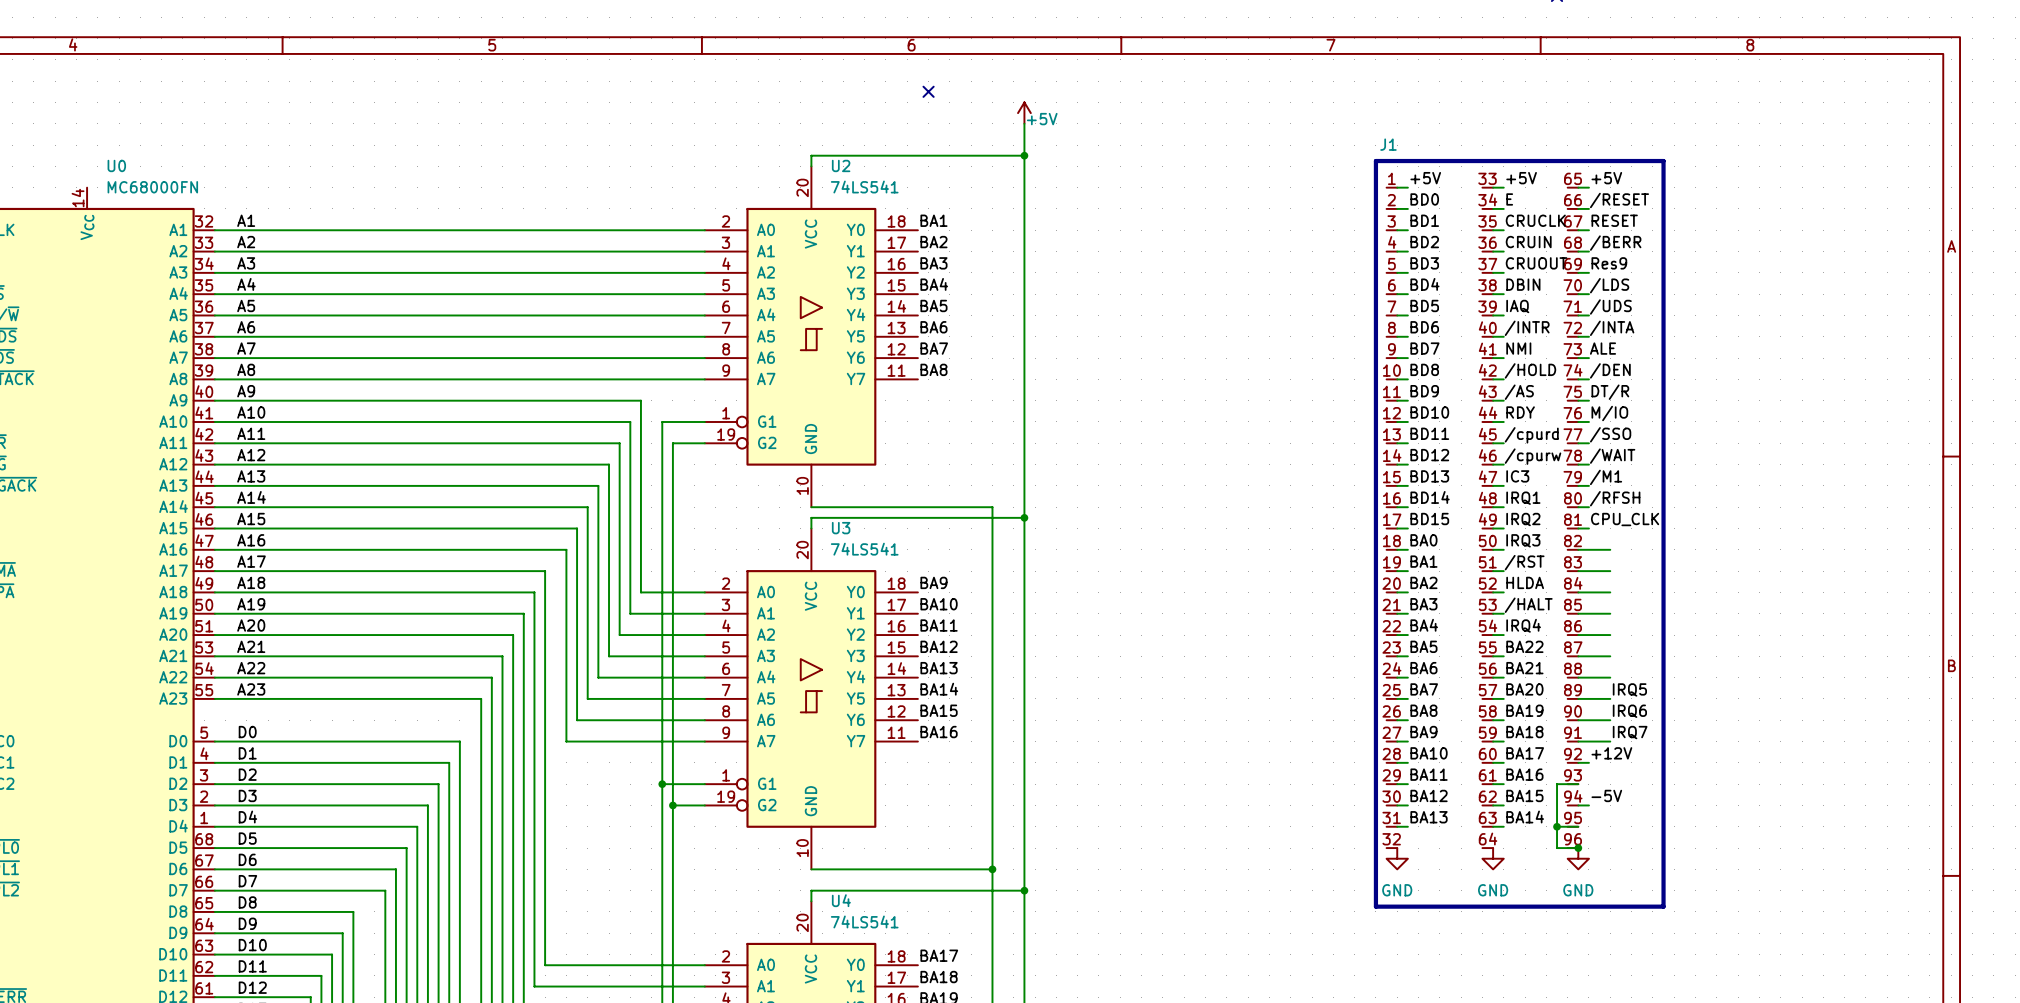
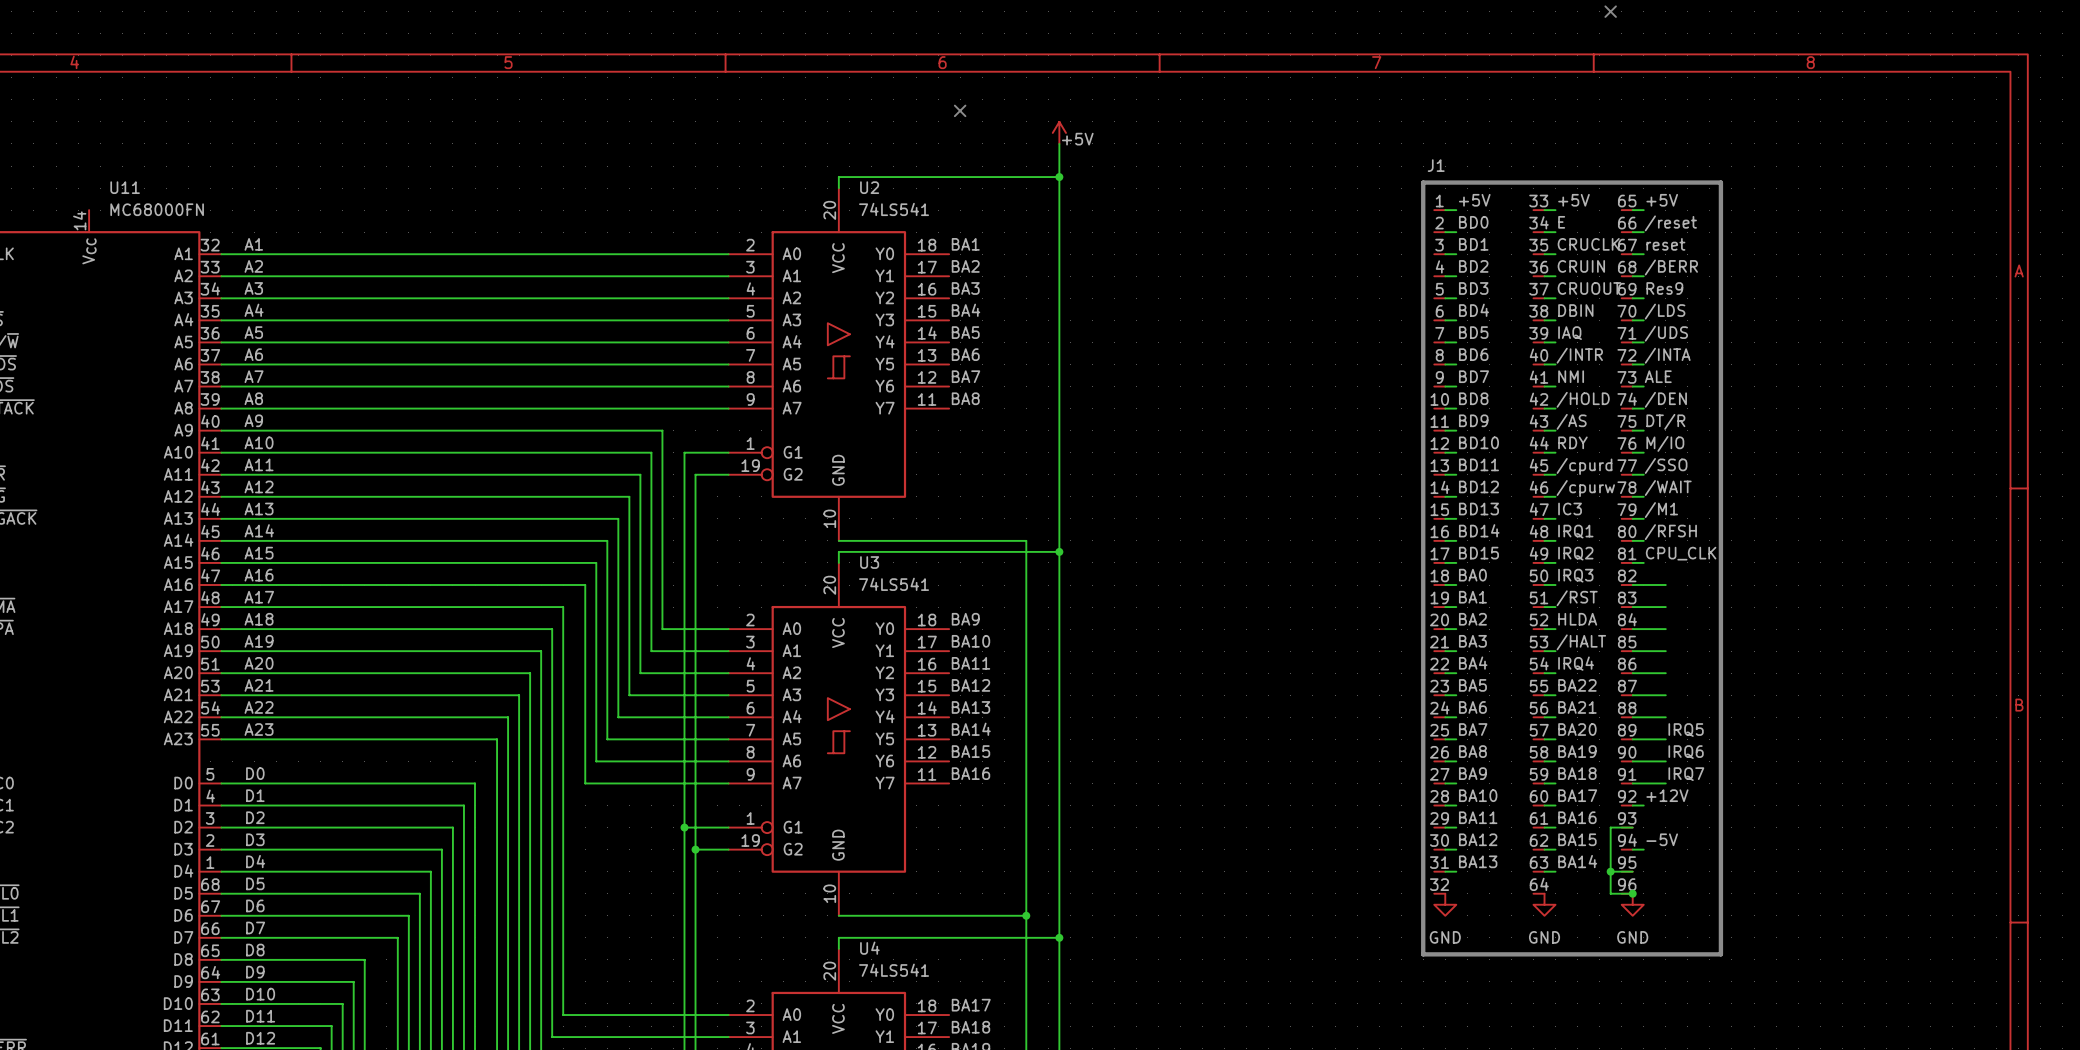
U0 name: U0 (116, 165) -> U11 (125, 187)
label: /RESET (1619, 200) -> /reset (1670, 223)
label: RESET (1614, 220) -> reset (1665, 244)

